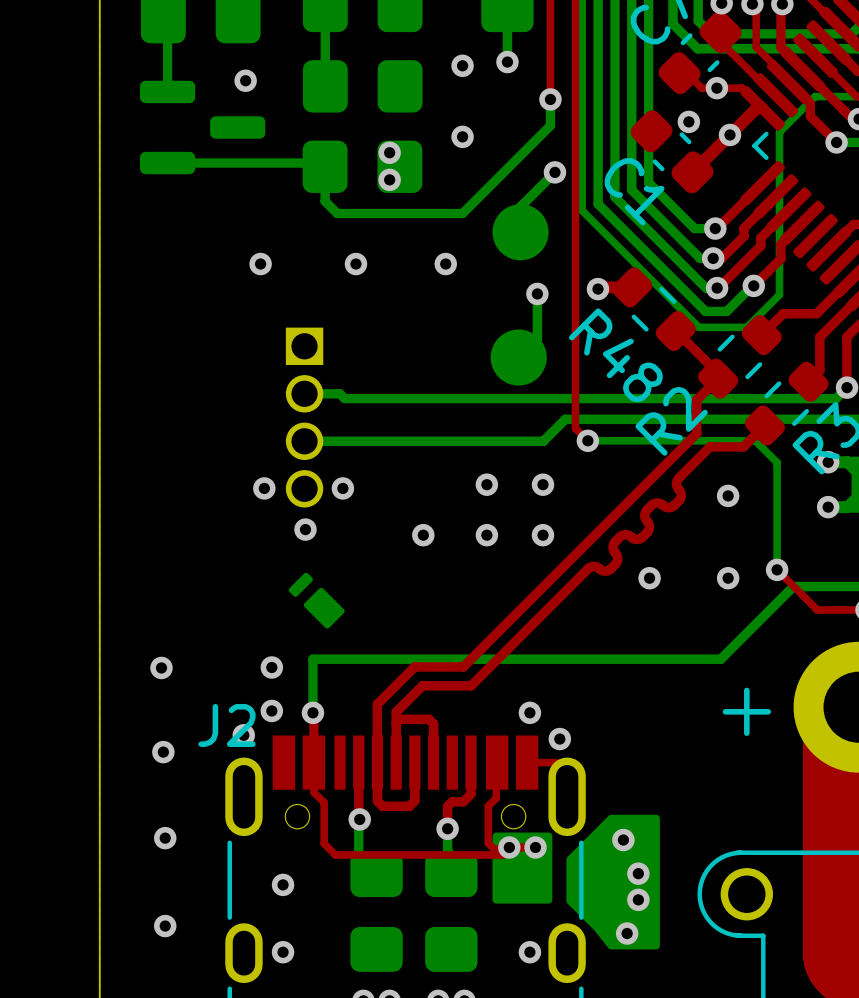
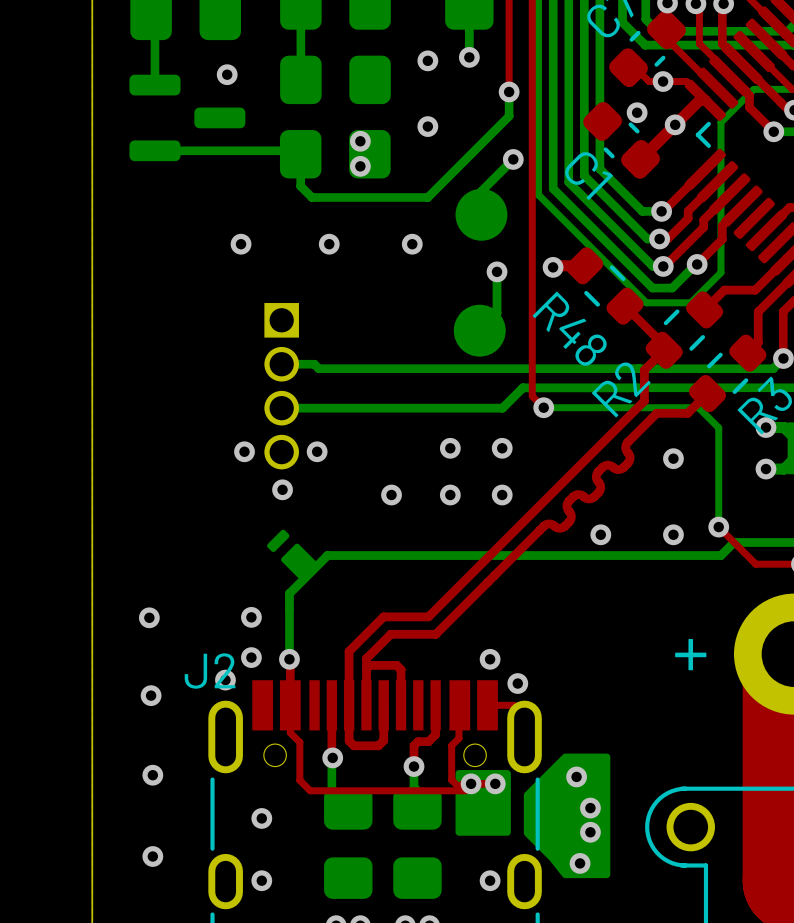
bottom track: (779, 600) (720, 659) (312, 659) -> (720, 555) (327, 555) (289, 593) (289, 609)

